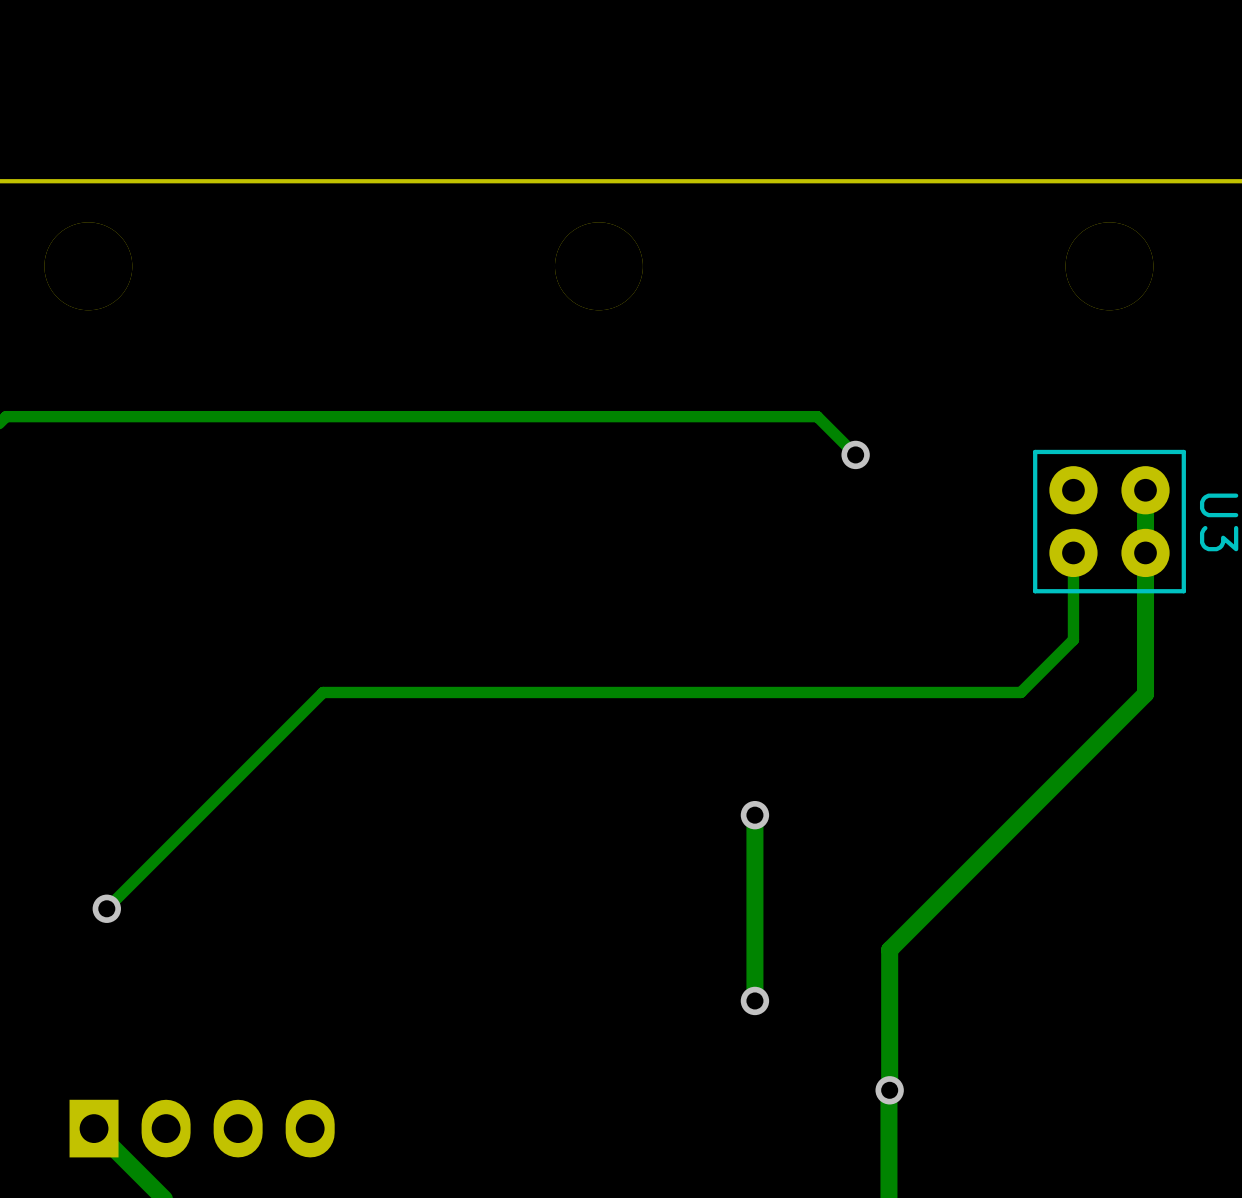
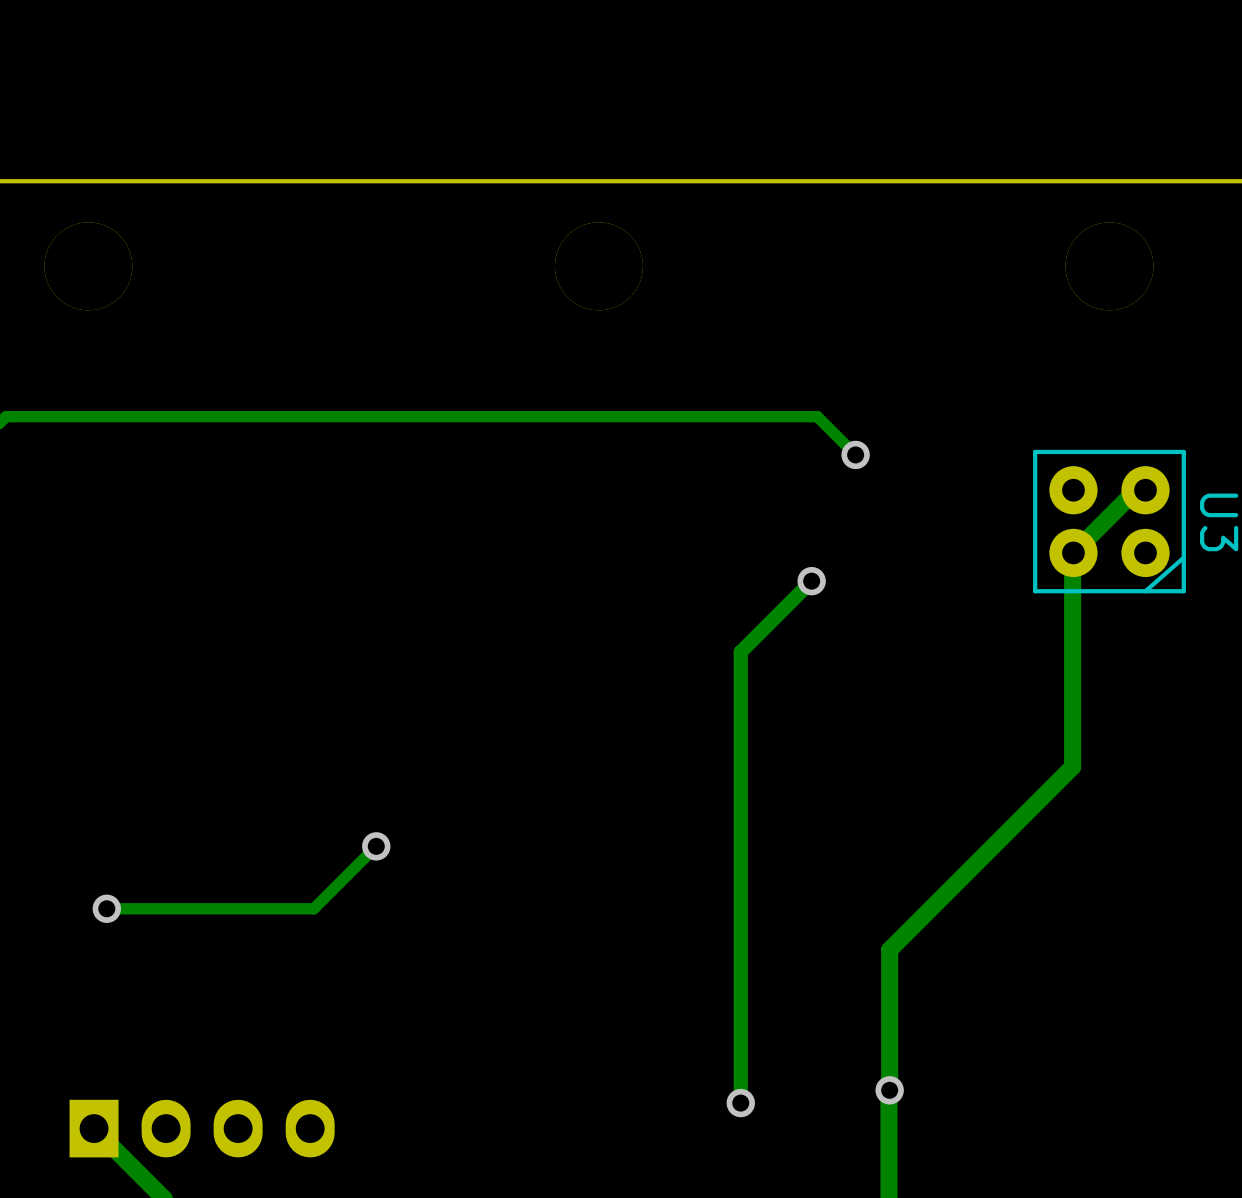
U3 footprint: [1033, 449, 1186, 594] -> [1033, 449, 1186, 594]
track: (1145, 490) (1145, 694) (1072, 766) -> (1145, 490) (1136, 490) (1072, 553) (1072, 766)
track: (1073, 552) (1073, 639) (1020, 692) (323, 692) (106, 908) -> (376, 846) (313, 908) (106, 908)
track: none -> (811, 581) (740, 652) (740, 1103)
via: none -> (811, 581)
track: (754, 815) (754, 1000) -> none
via: (754, 815) -> none
via: none -> (376, 846)
via position: (754, 1000) -> (740, 1103)

